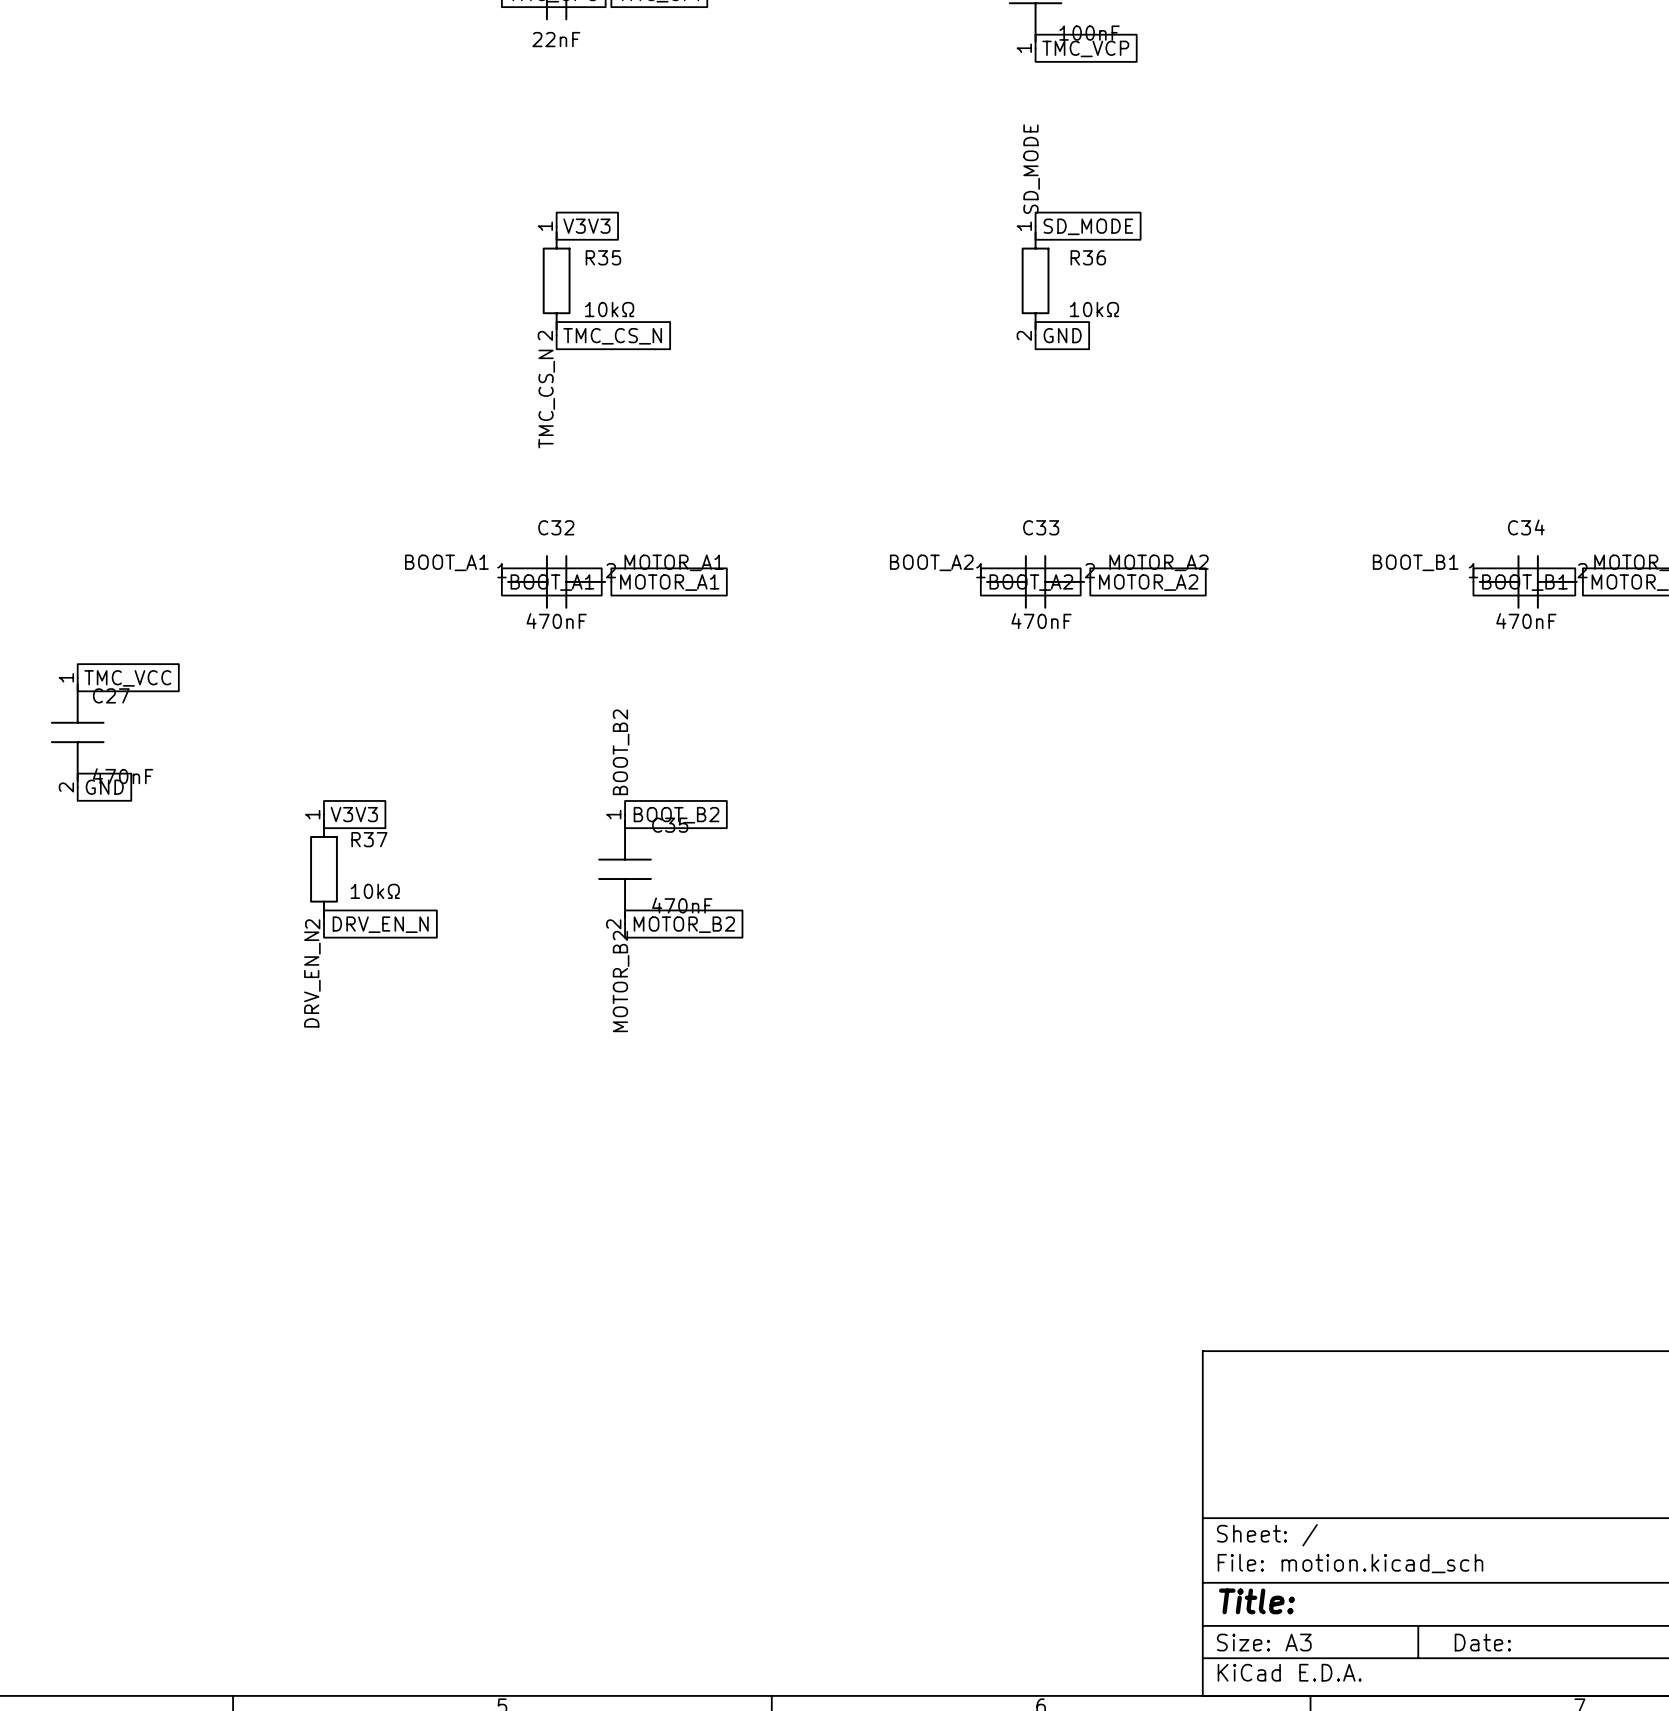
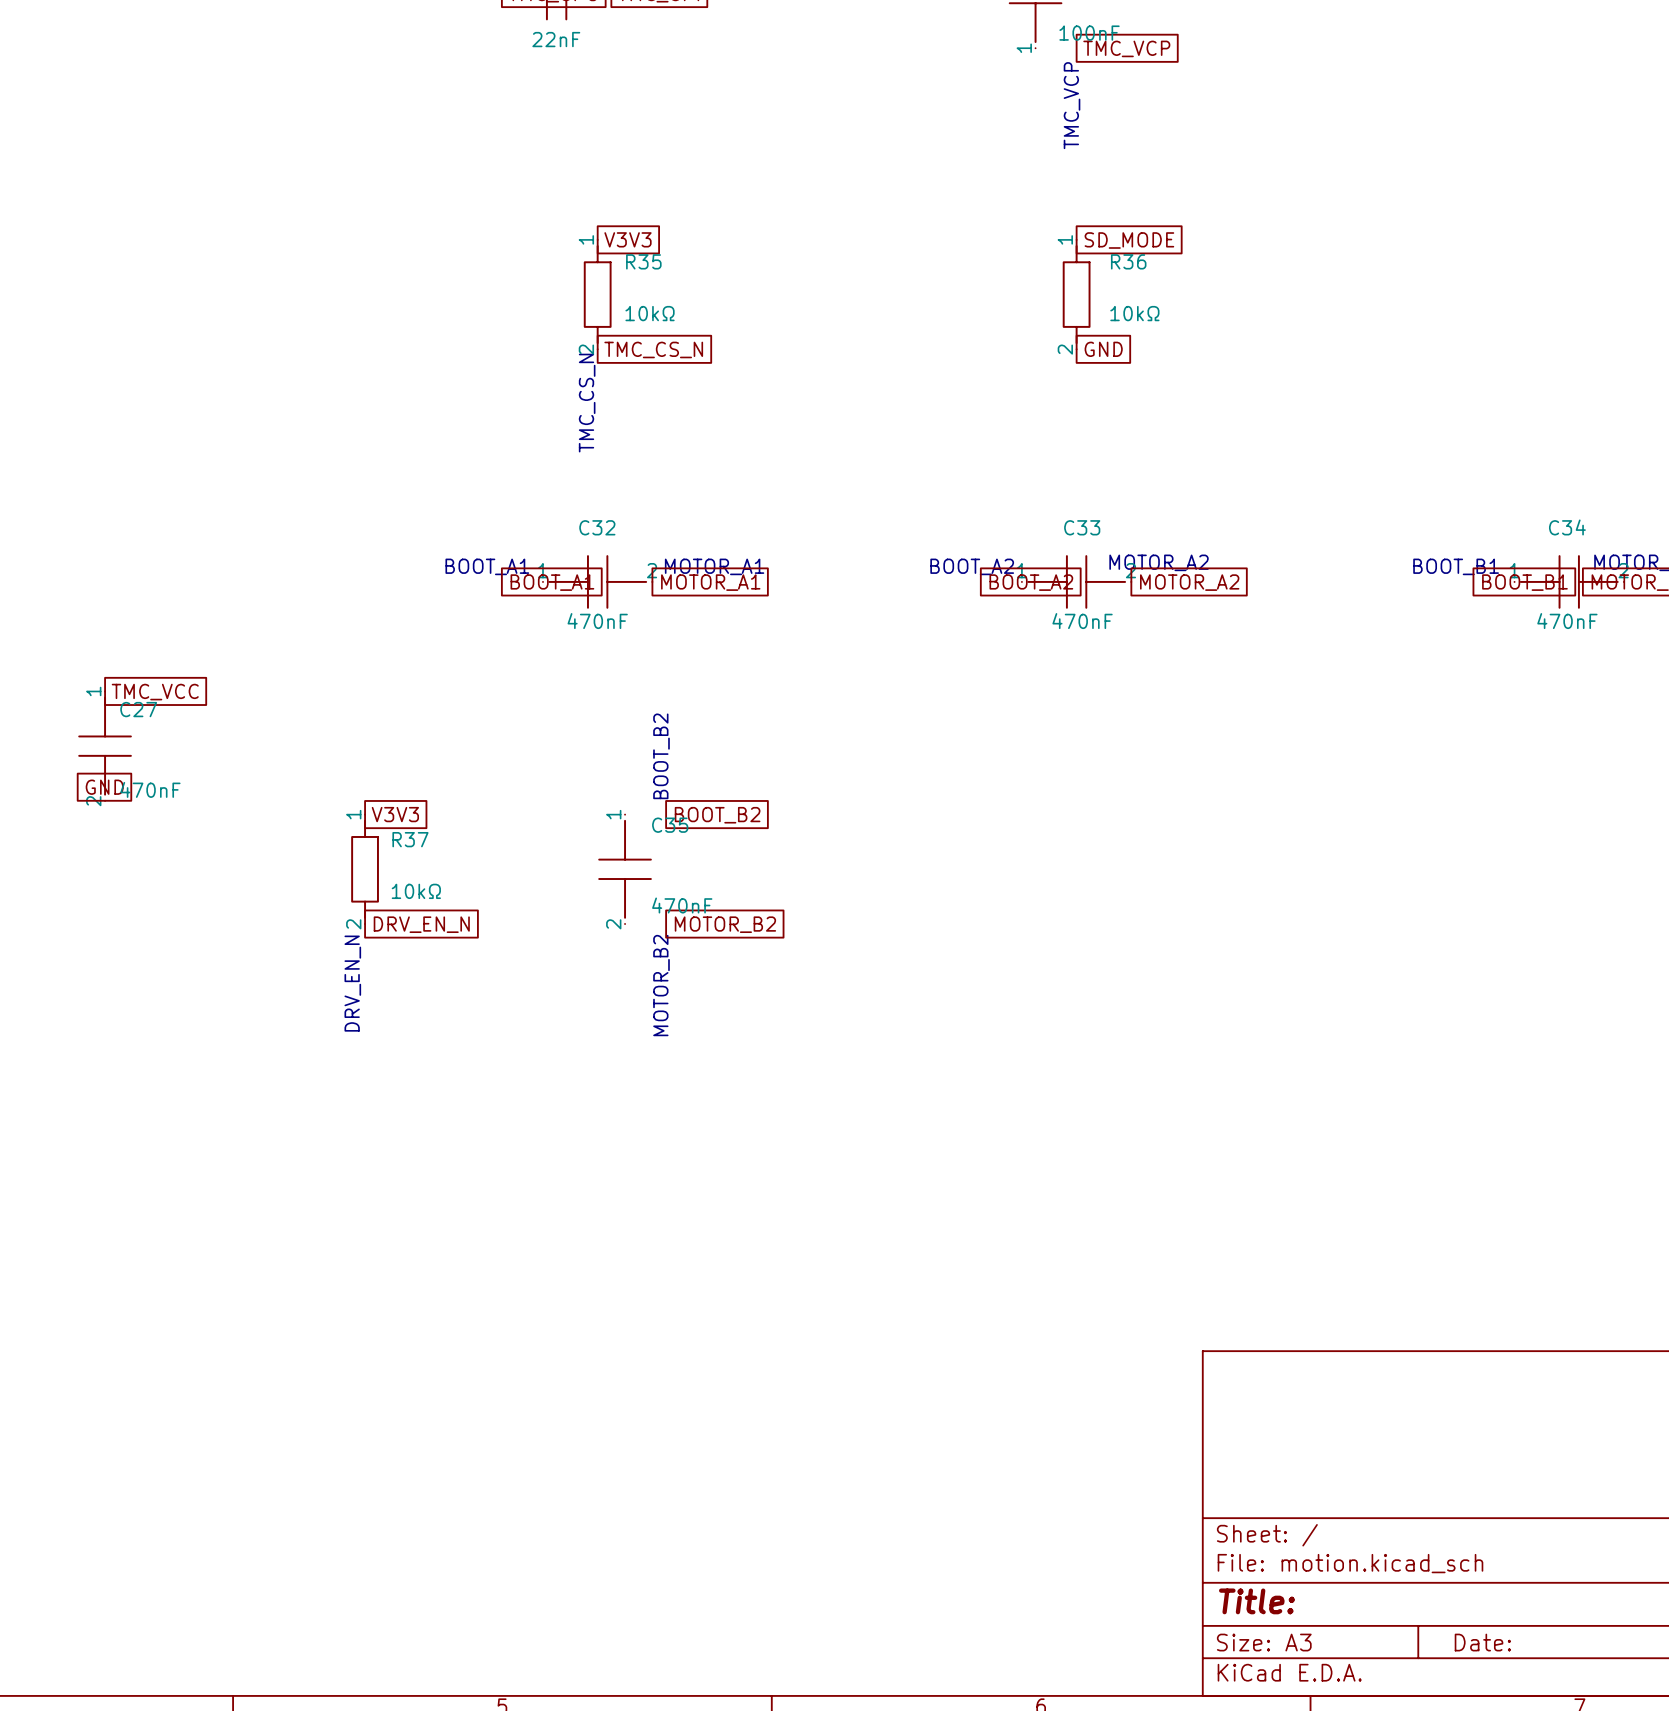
global label position: TMC_VCP (1085, 48) -> TMC_VCP (1126, 48)
text: none -> TMC_VCP (1072, 105)
text: SD_MODE (1031, 169) -> none
global label position: V3V3 (586, 226) -> V3V3 (628, 239)
global label position: SD_MODE (1088, 226) -> SD_MODE (1129, 240)
R35 name position: R35 (603, 257) -> R35 (643, 261)
R36 name position: R36 (1088, 257) -> R36 (1128, 261)
R35 position: (556, 280) -> (597, 294)
R36 position: (1035, 280) -> (1076, 294)
R35 value position: 10kΩ (609, 309) -> 10kΩ (650, 313)
R36 value position: 10kΩ (1094, 309) -> 10kΩ (1134, 313)
global label position: GND (1062, 335) -> GND (1103, 349)
global label position: TMC_CS_N (612, 336) -> TMC_CS_N (653, 349)
text position: TMC_CS_N (546, 399) -> TMC_CS_N (587, 403)
text position: BOOT_A1 (446, 562) -> BOOT_A1 (487, 566)
text position: MOTOR_A1 (674, 562) -> MOTOR_A1 (714, 566)
text position: BOOT_A2 (931, 562) -> BOOT_A2 (972, 566)
text position: BOOT_B1 (1415, 562) -> BOOT_B1 (1456, 566)
C32 position: (556, 581) -> (597, 581)
C33 position: (1035, 581) -> (1076, 581)
C34 position: (1528, 581) -> (1569, 581)
global label position: MOTOR_A1 (669, 582) -> MOTOR_A1 (710, 582)
global label position: MOTOR_A2 (1148, 582) -> MOTOR_A2 (1189, 582)
global label position: TMC_VCC (127, 678) -> TMC_VCC (155, 692)
C27 position: (77, 732) -> (105, 746)
text position: BOOT_B2 (621, 752) -> BOOT_B2 (661, 756)
global label position: V3V3 (354, 814) -> V3V3 (395, 814)
global label position: BOOT_B2 (676, 815) -> BOOT_B2 (717, 815)
R37 position: (324, 869) -> (365, 869)
global label position: DRV_EN_N (380, 924) -> DRV_EN_N (421, 924)
global label position: MOTOR_B2 (684, 924) -> MOTOR_B2 (725, 924)
text position: DRV_EN_N (312, 979) -> DRV_EN_N (352, 983)
text position: MOTOR_B2 (621, 981) -> MOTOR_B2 (661, 985)

